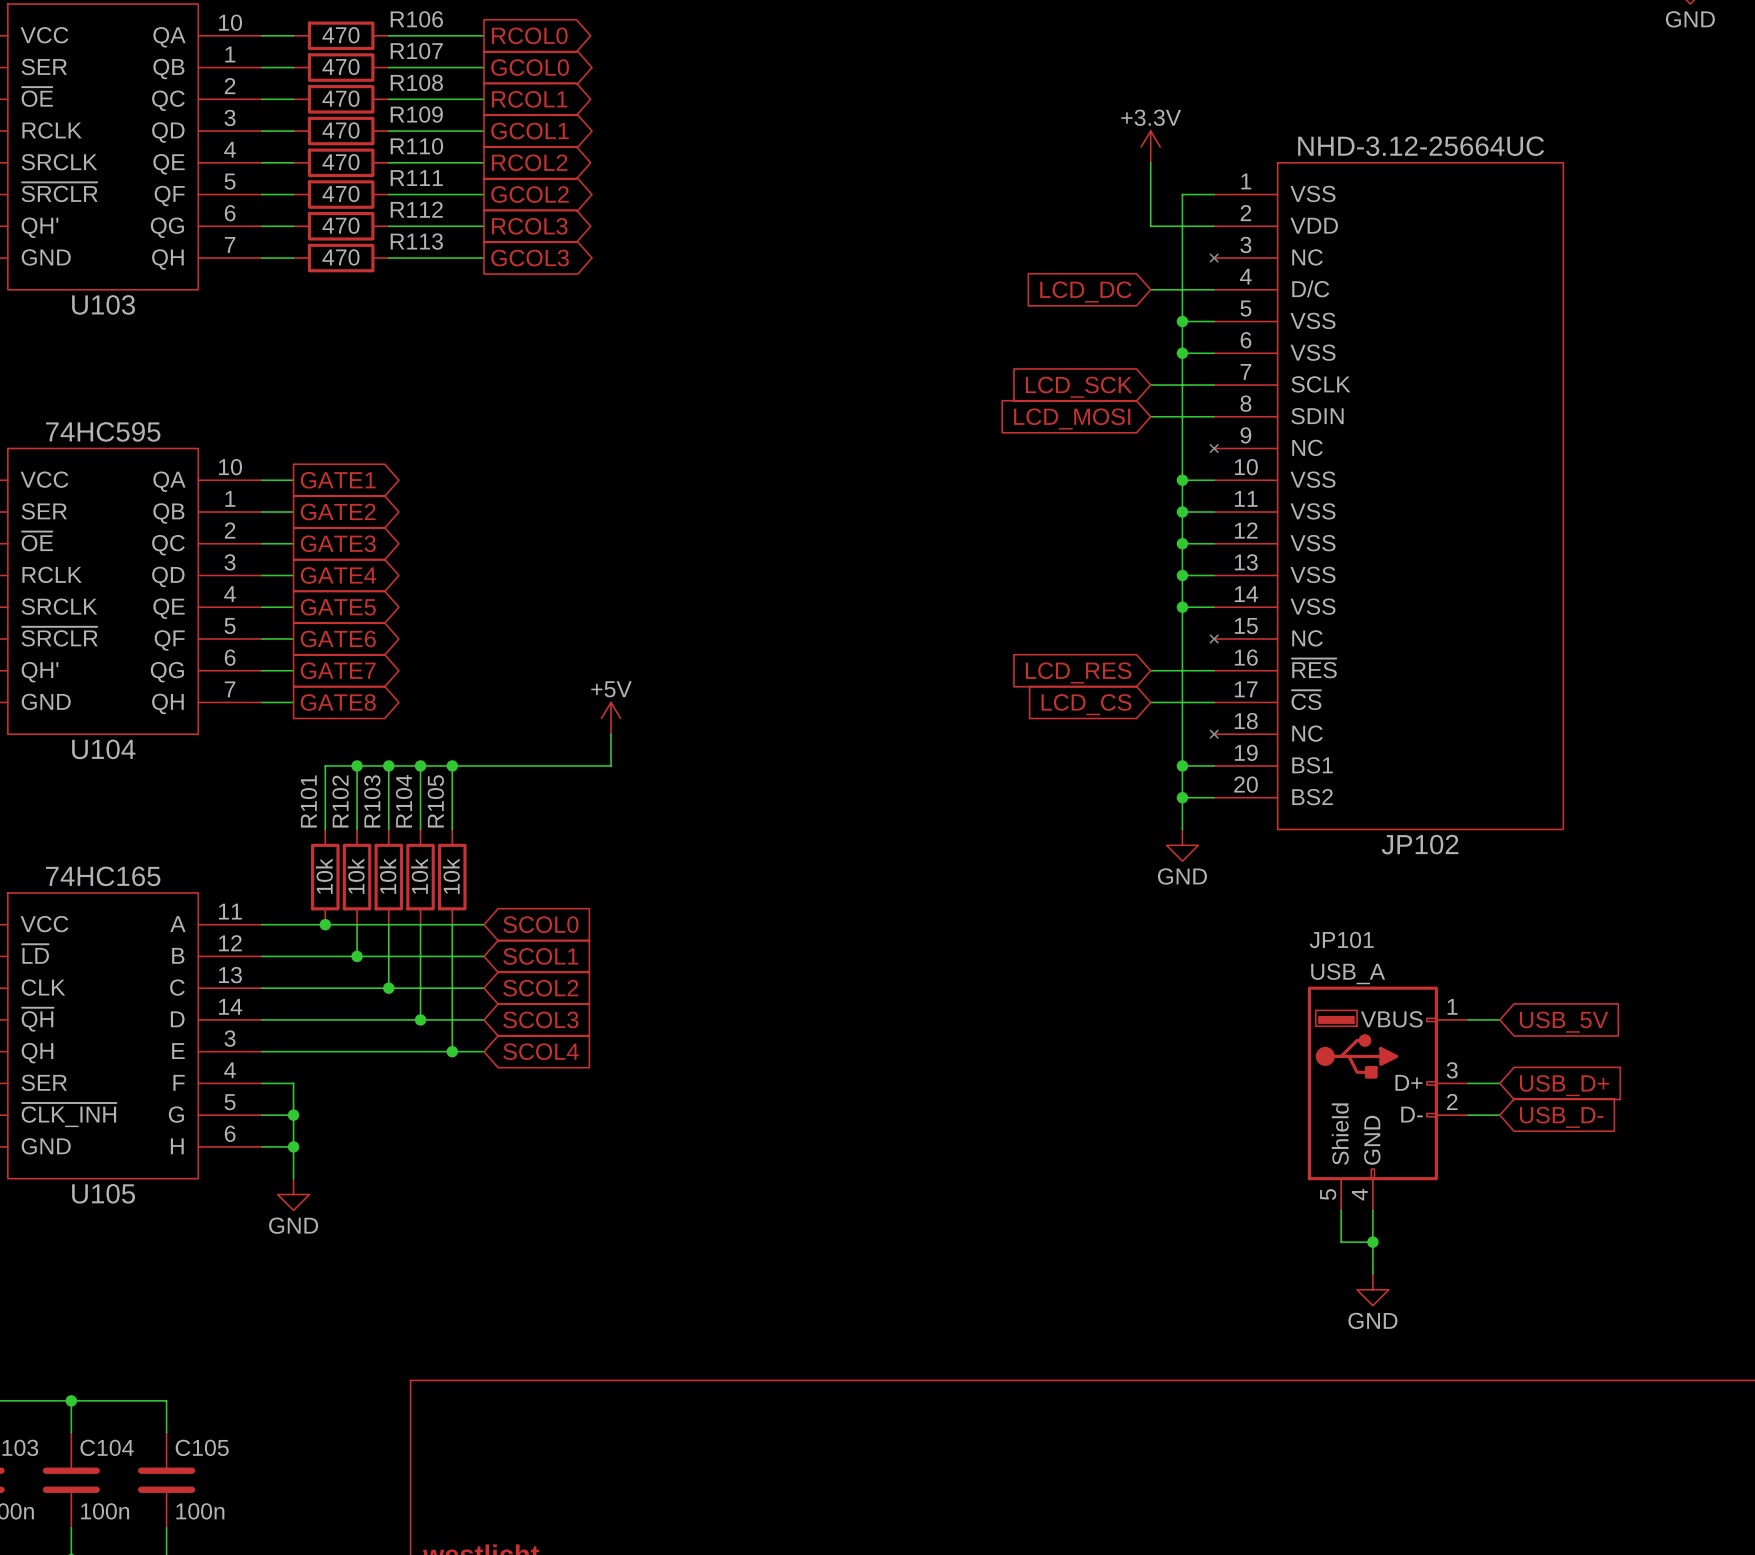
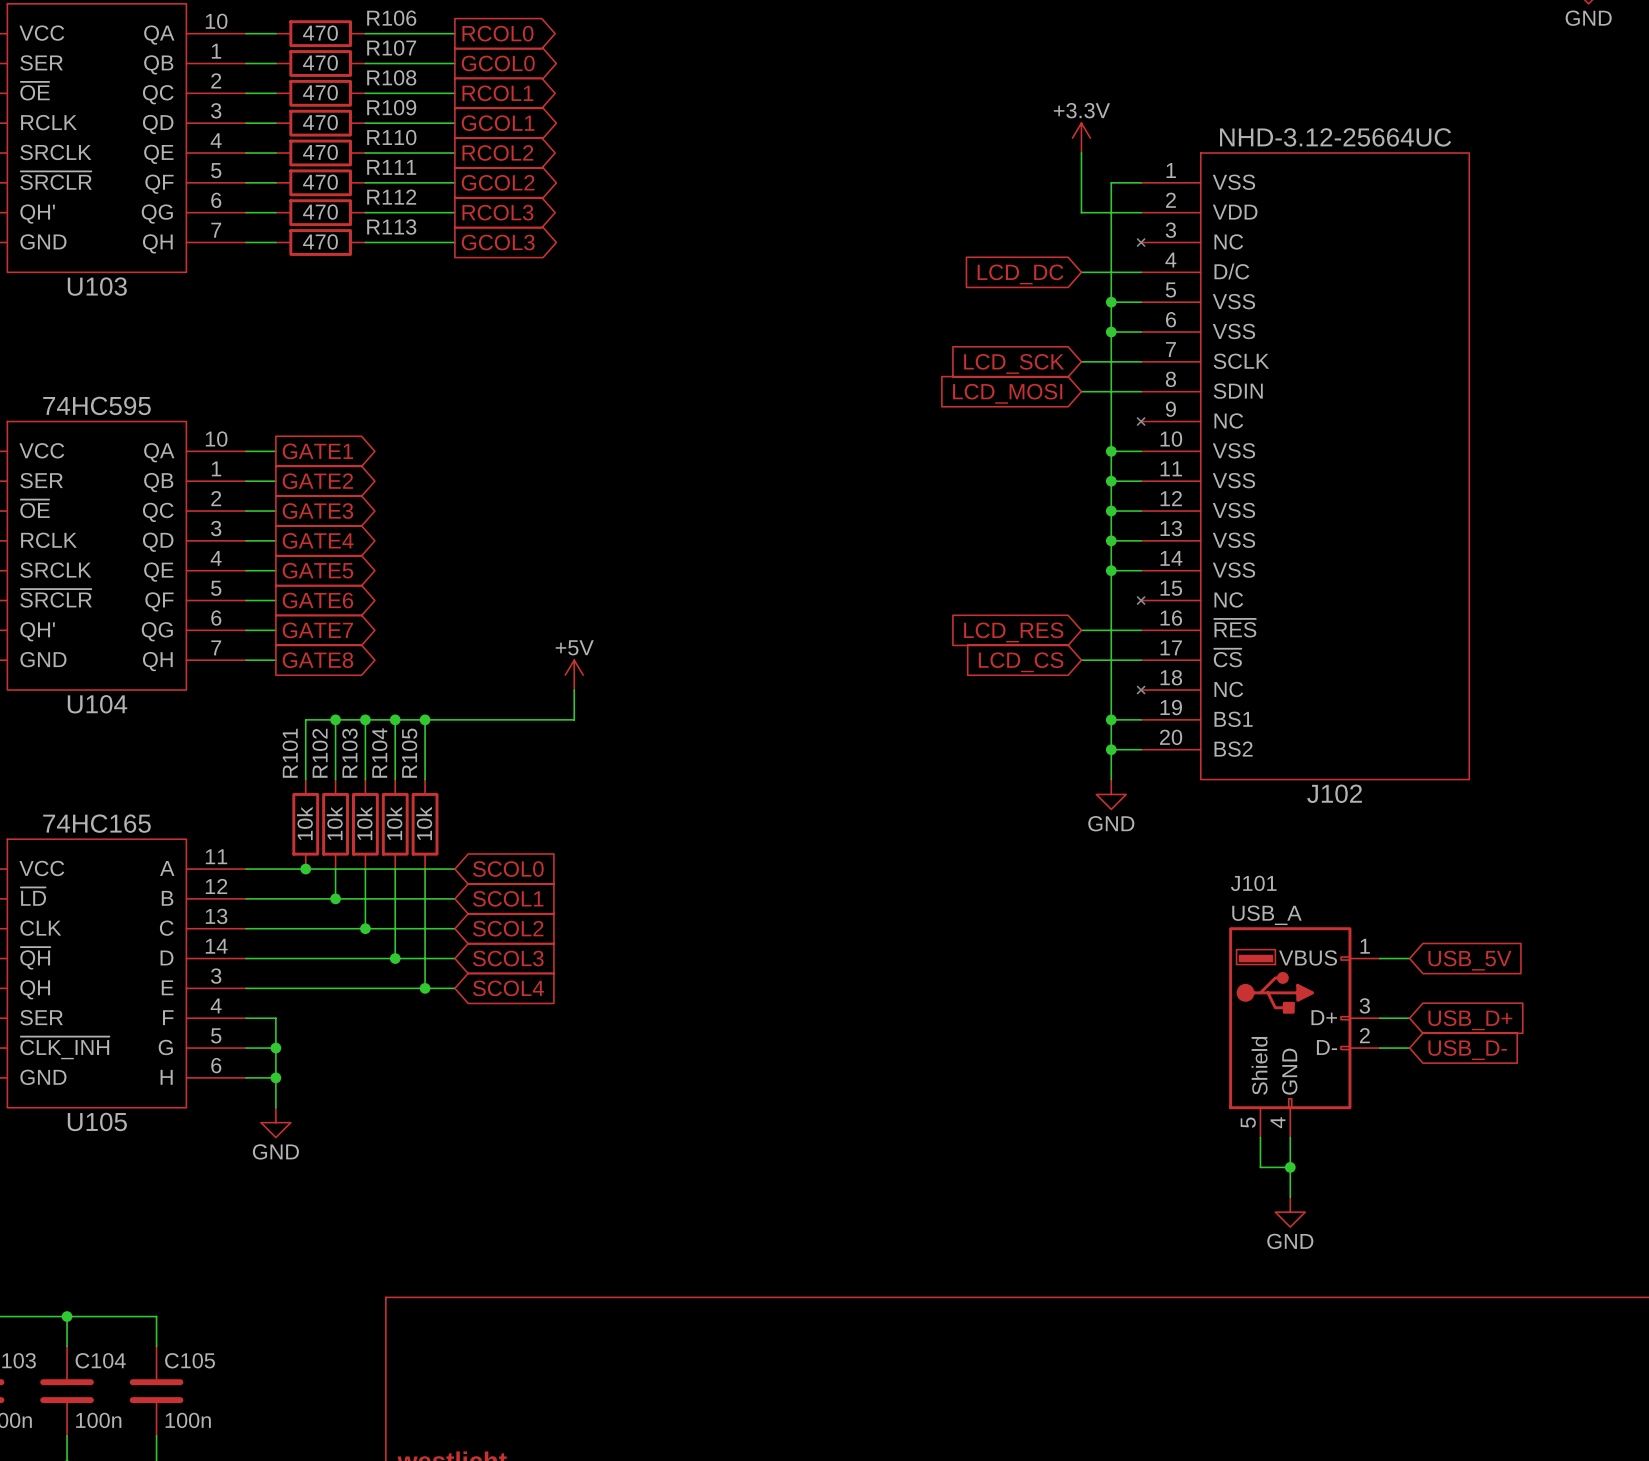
JP102 name: JP102 (1420, 844) -> J102 (1334, 793)
JP101 name: JP101 (1341, 939) -> J101 (1253, 883)

